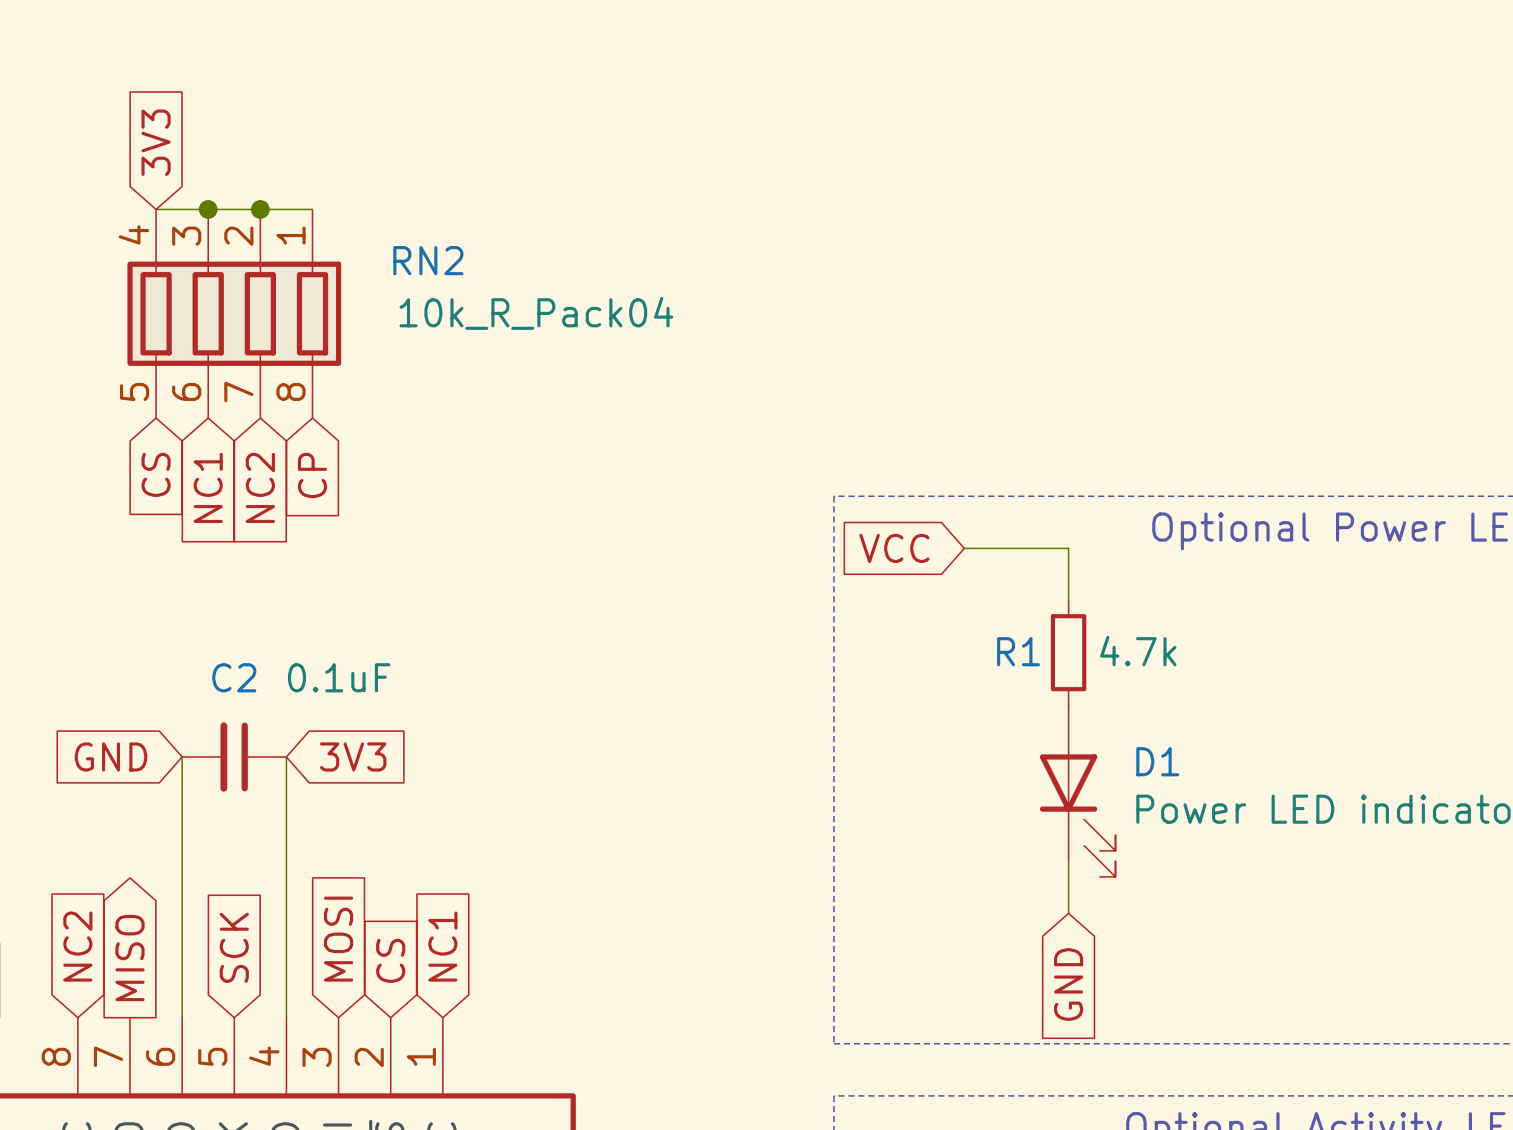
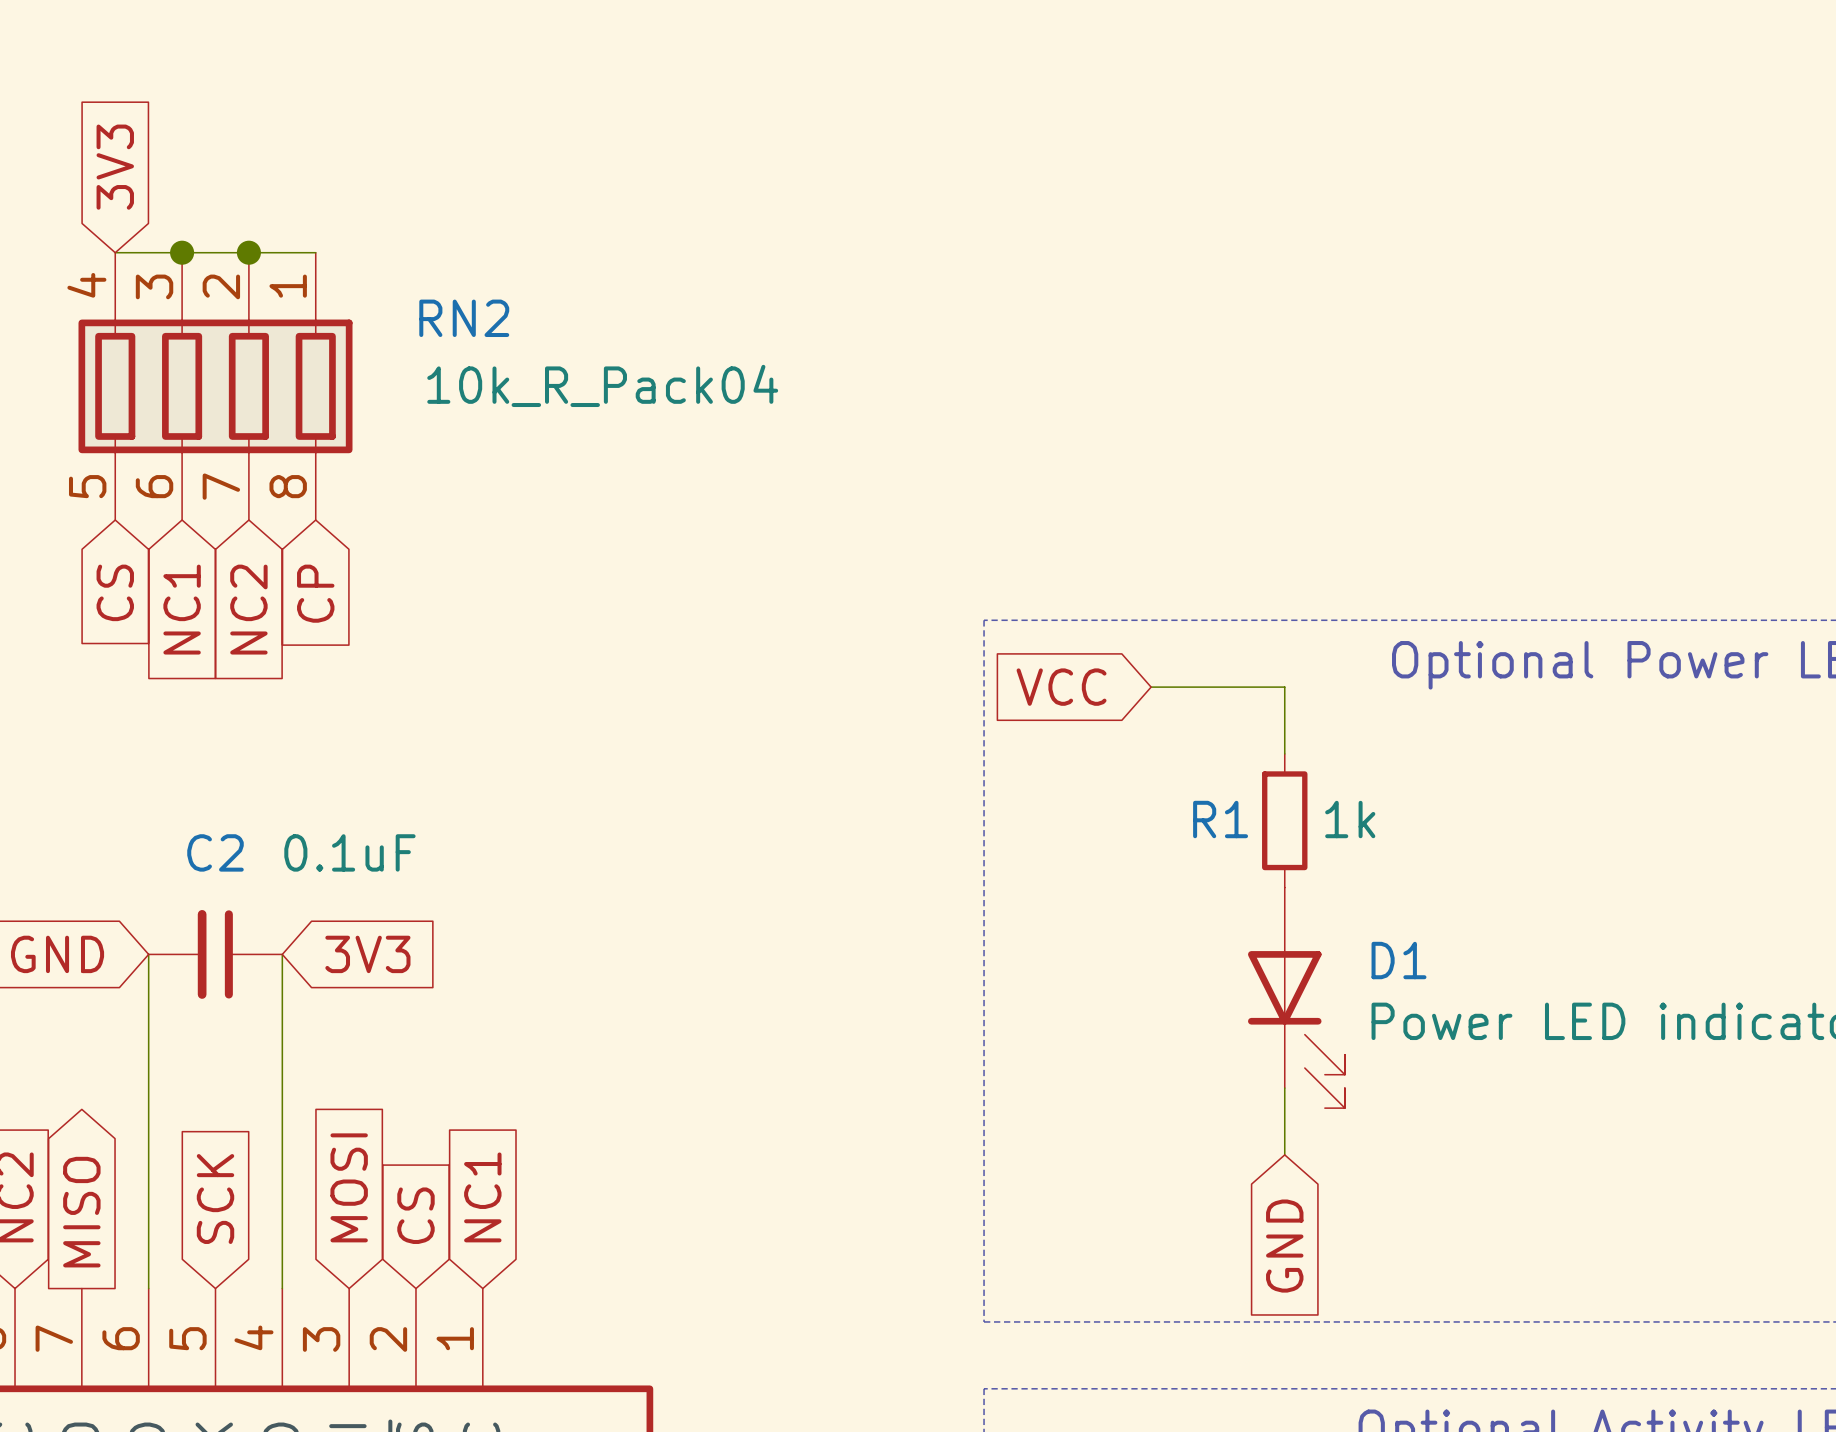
R1 value: 4.7k (1138, 651) -> 1k (1350, 819)

